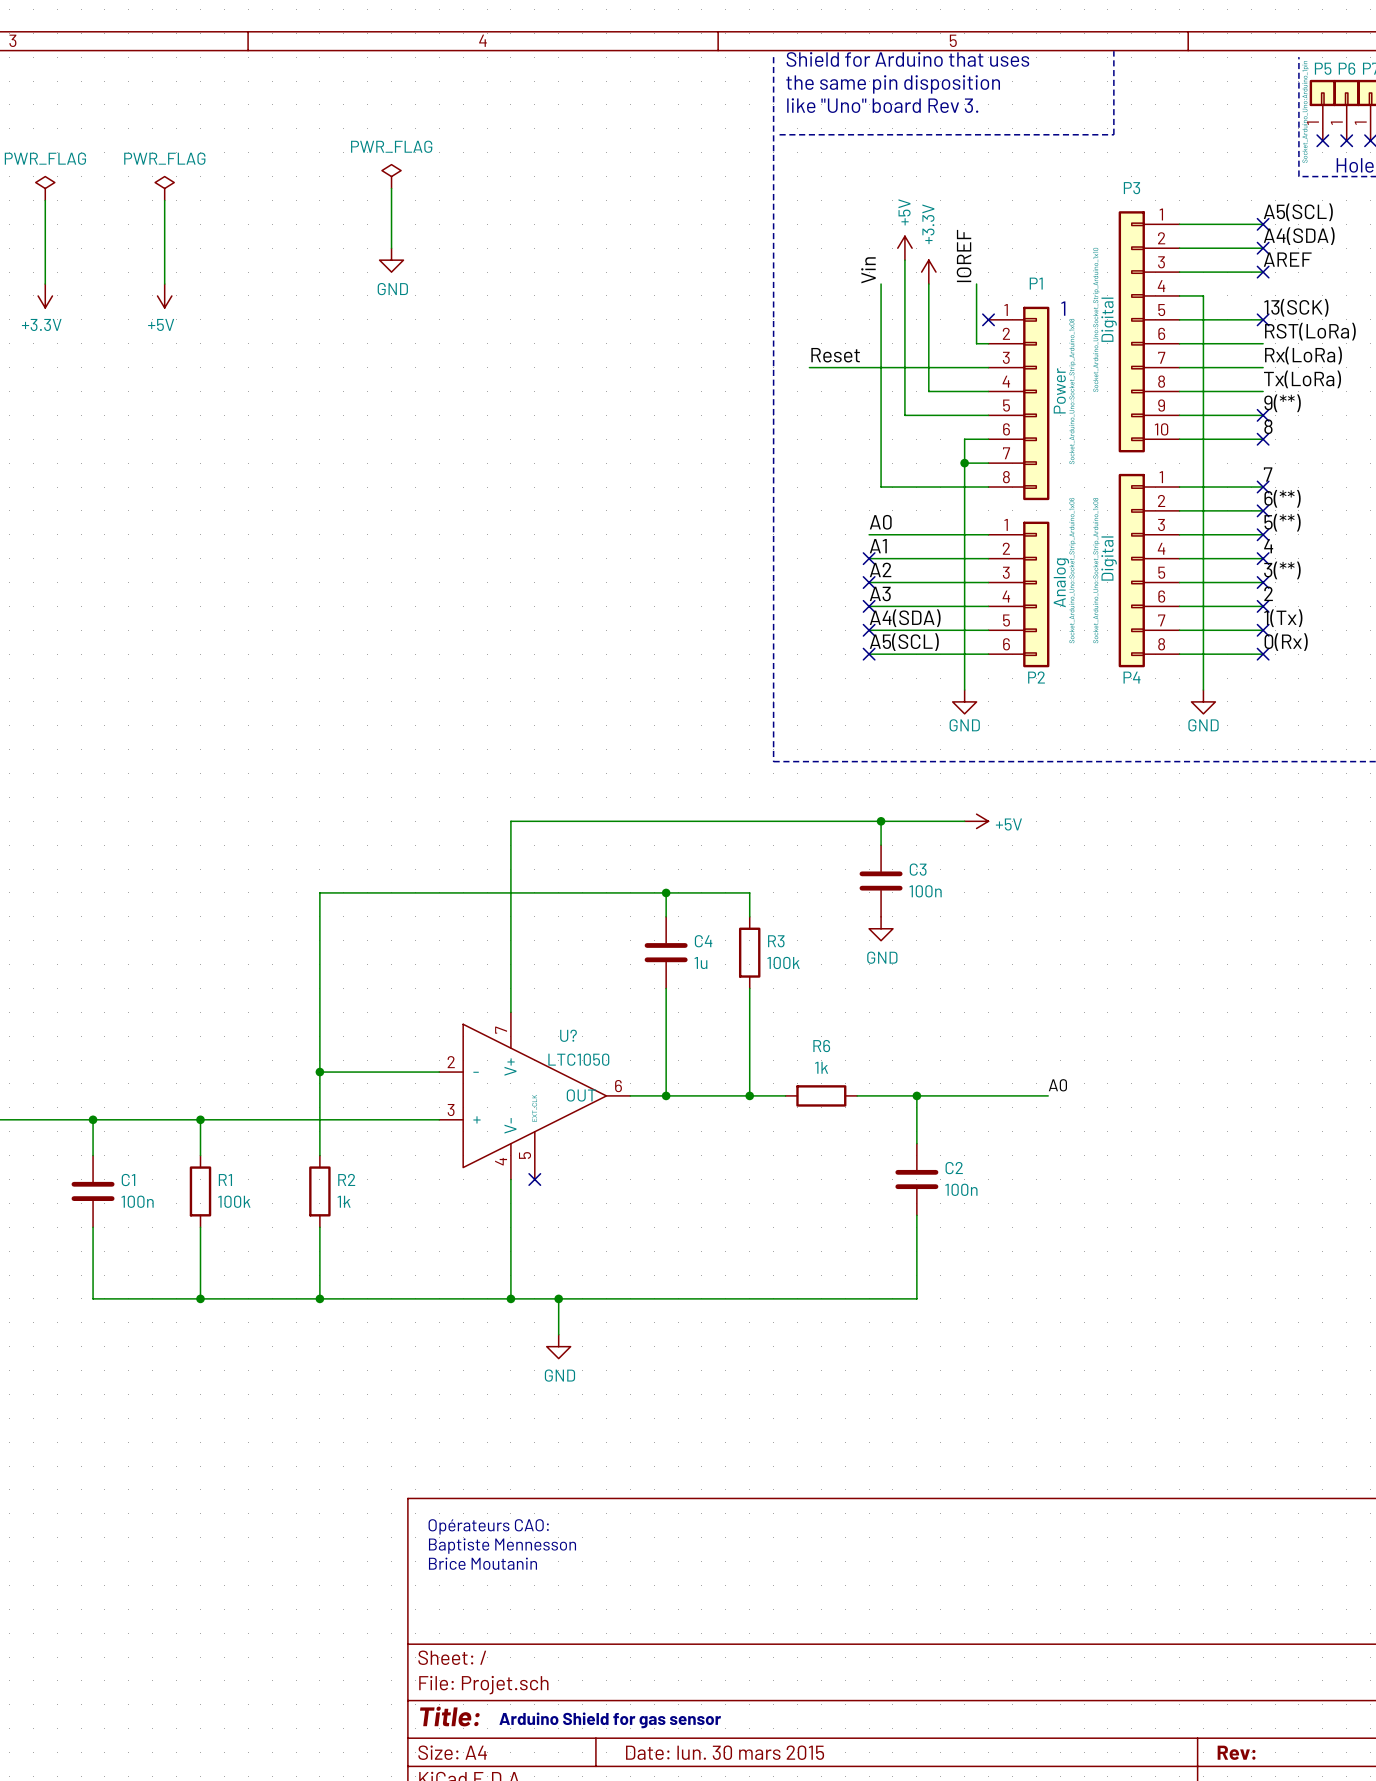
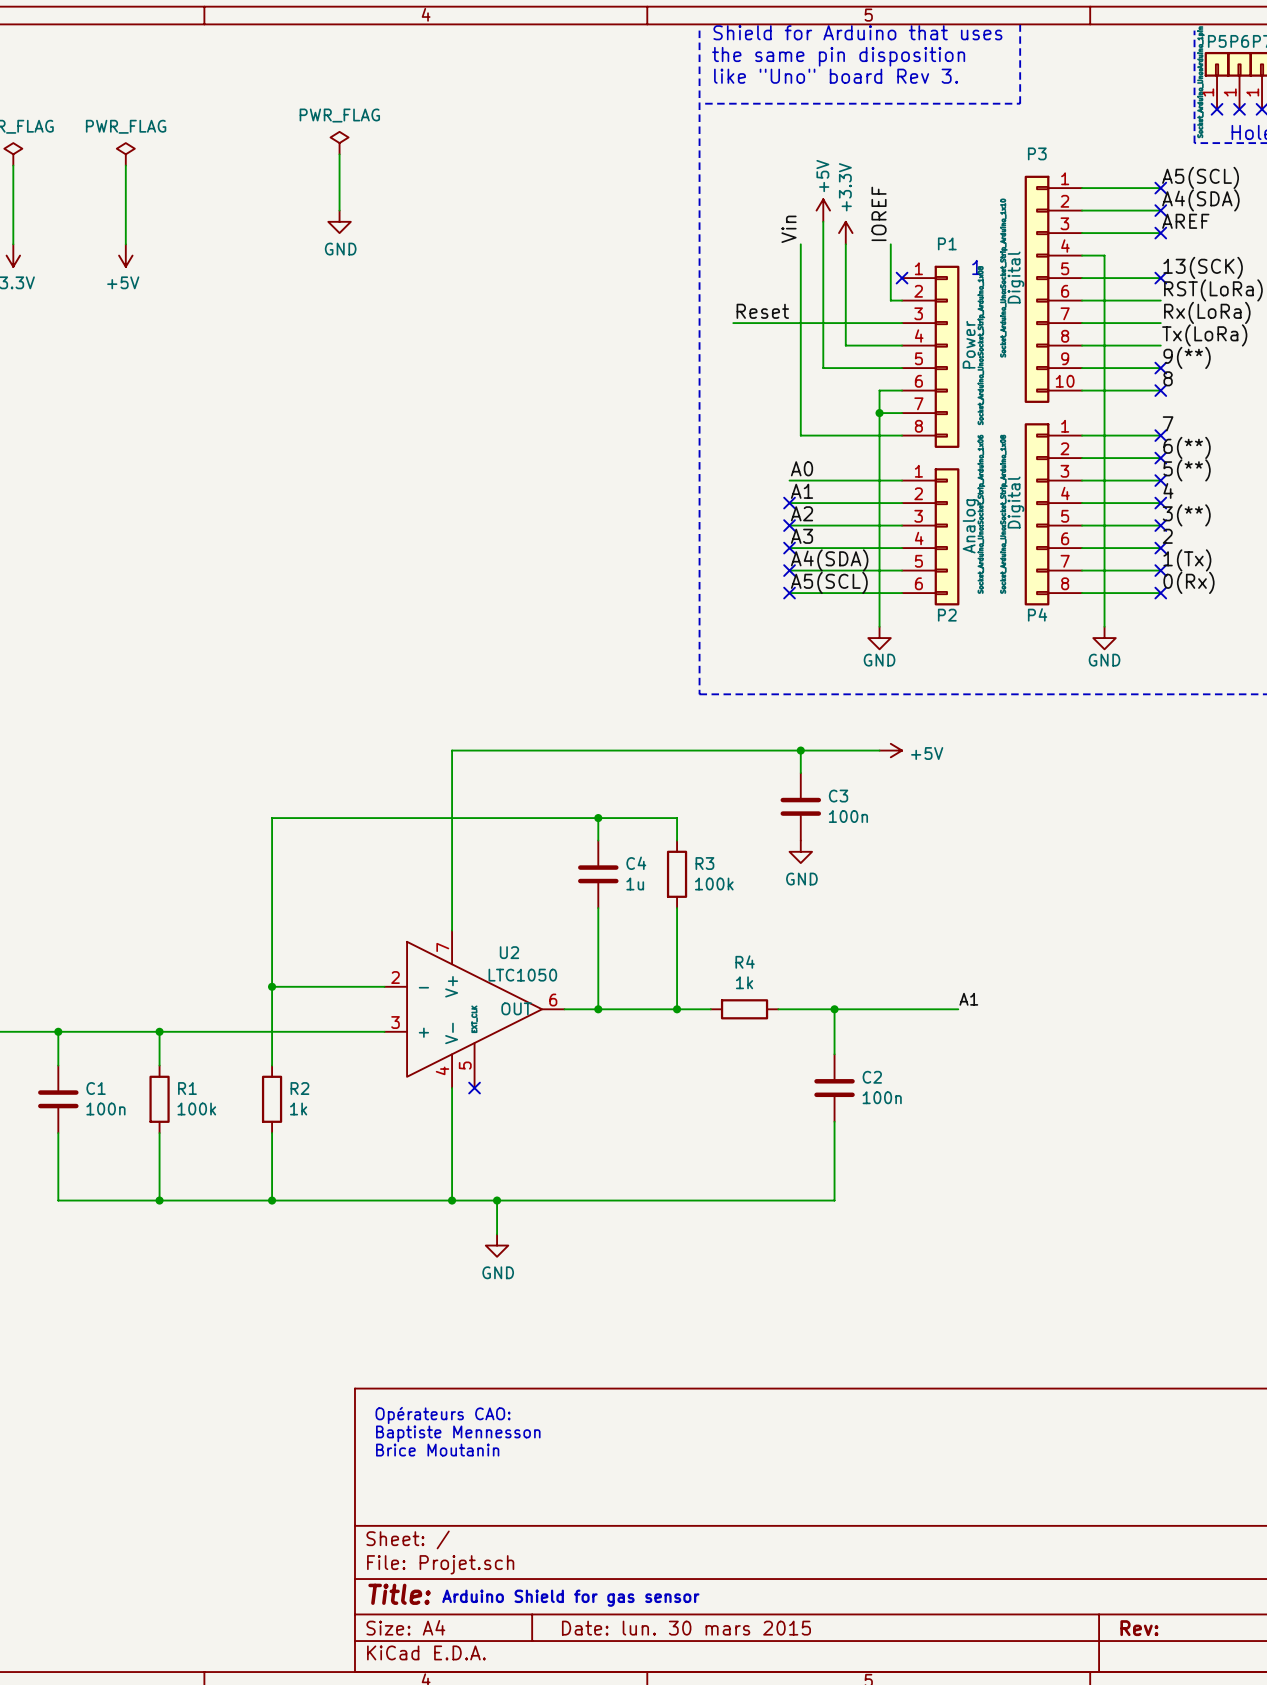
U? name: U? (568, 1035) -> U2 (509, 952)
R6 name: R6 (821, 1046) -> R4 (745, 962)
label: A0 (1057, 1085) -> A1 (968, 999)

